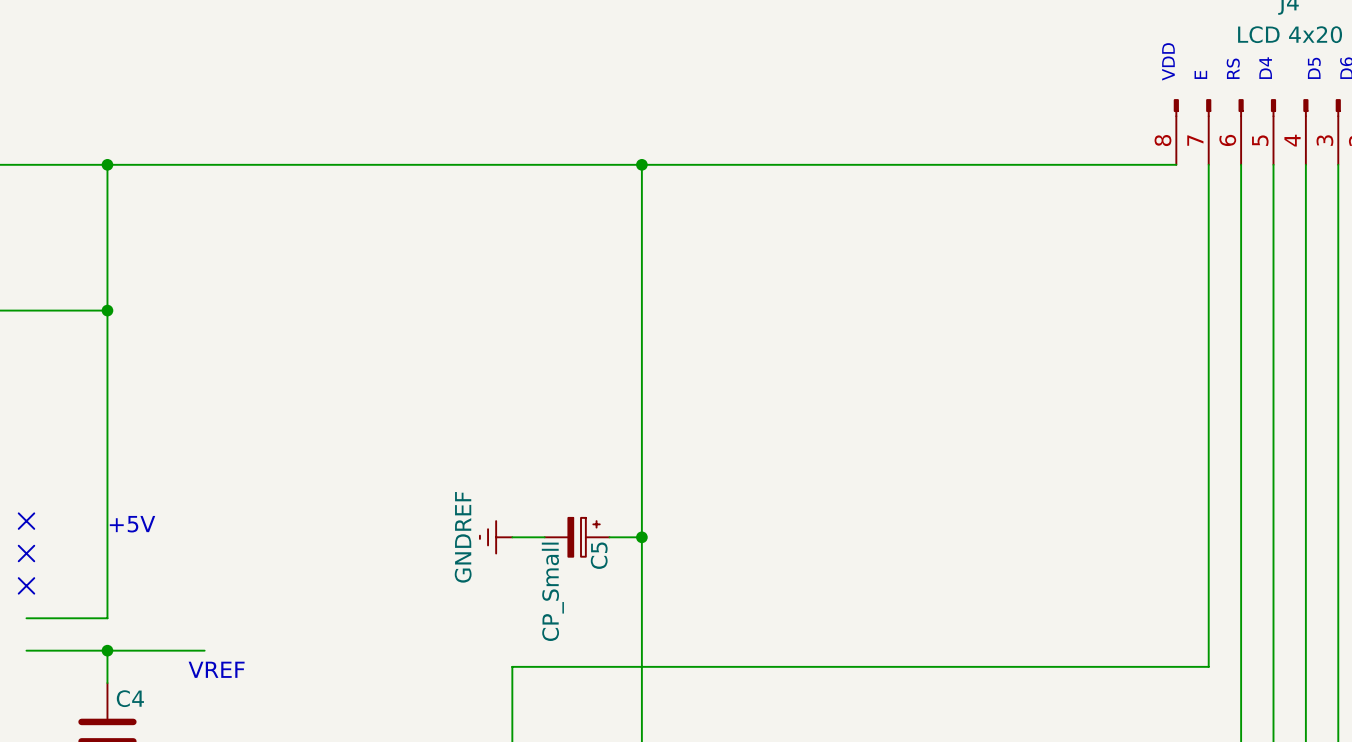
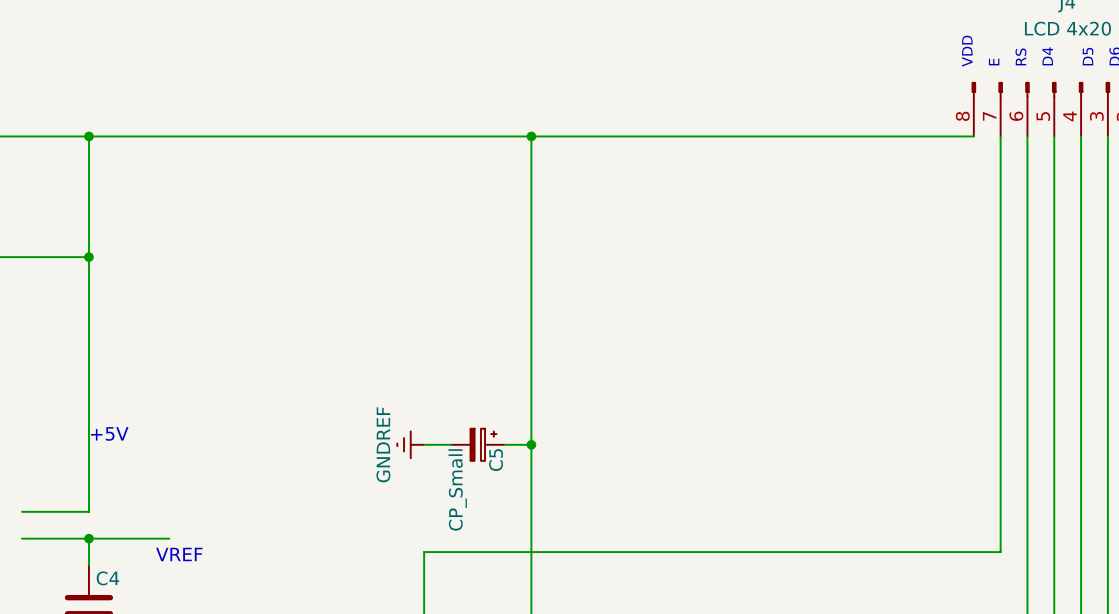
no-connect mark: (26, 521) -> none
no-connect mark: (26, 553) -> none
no-connect mark: (26, 585) -> none

